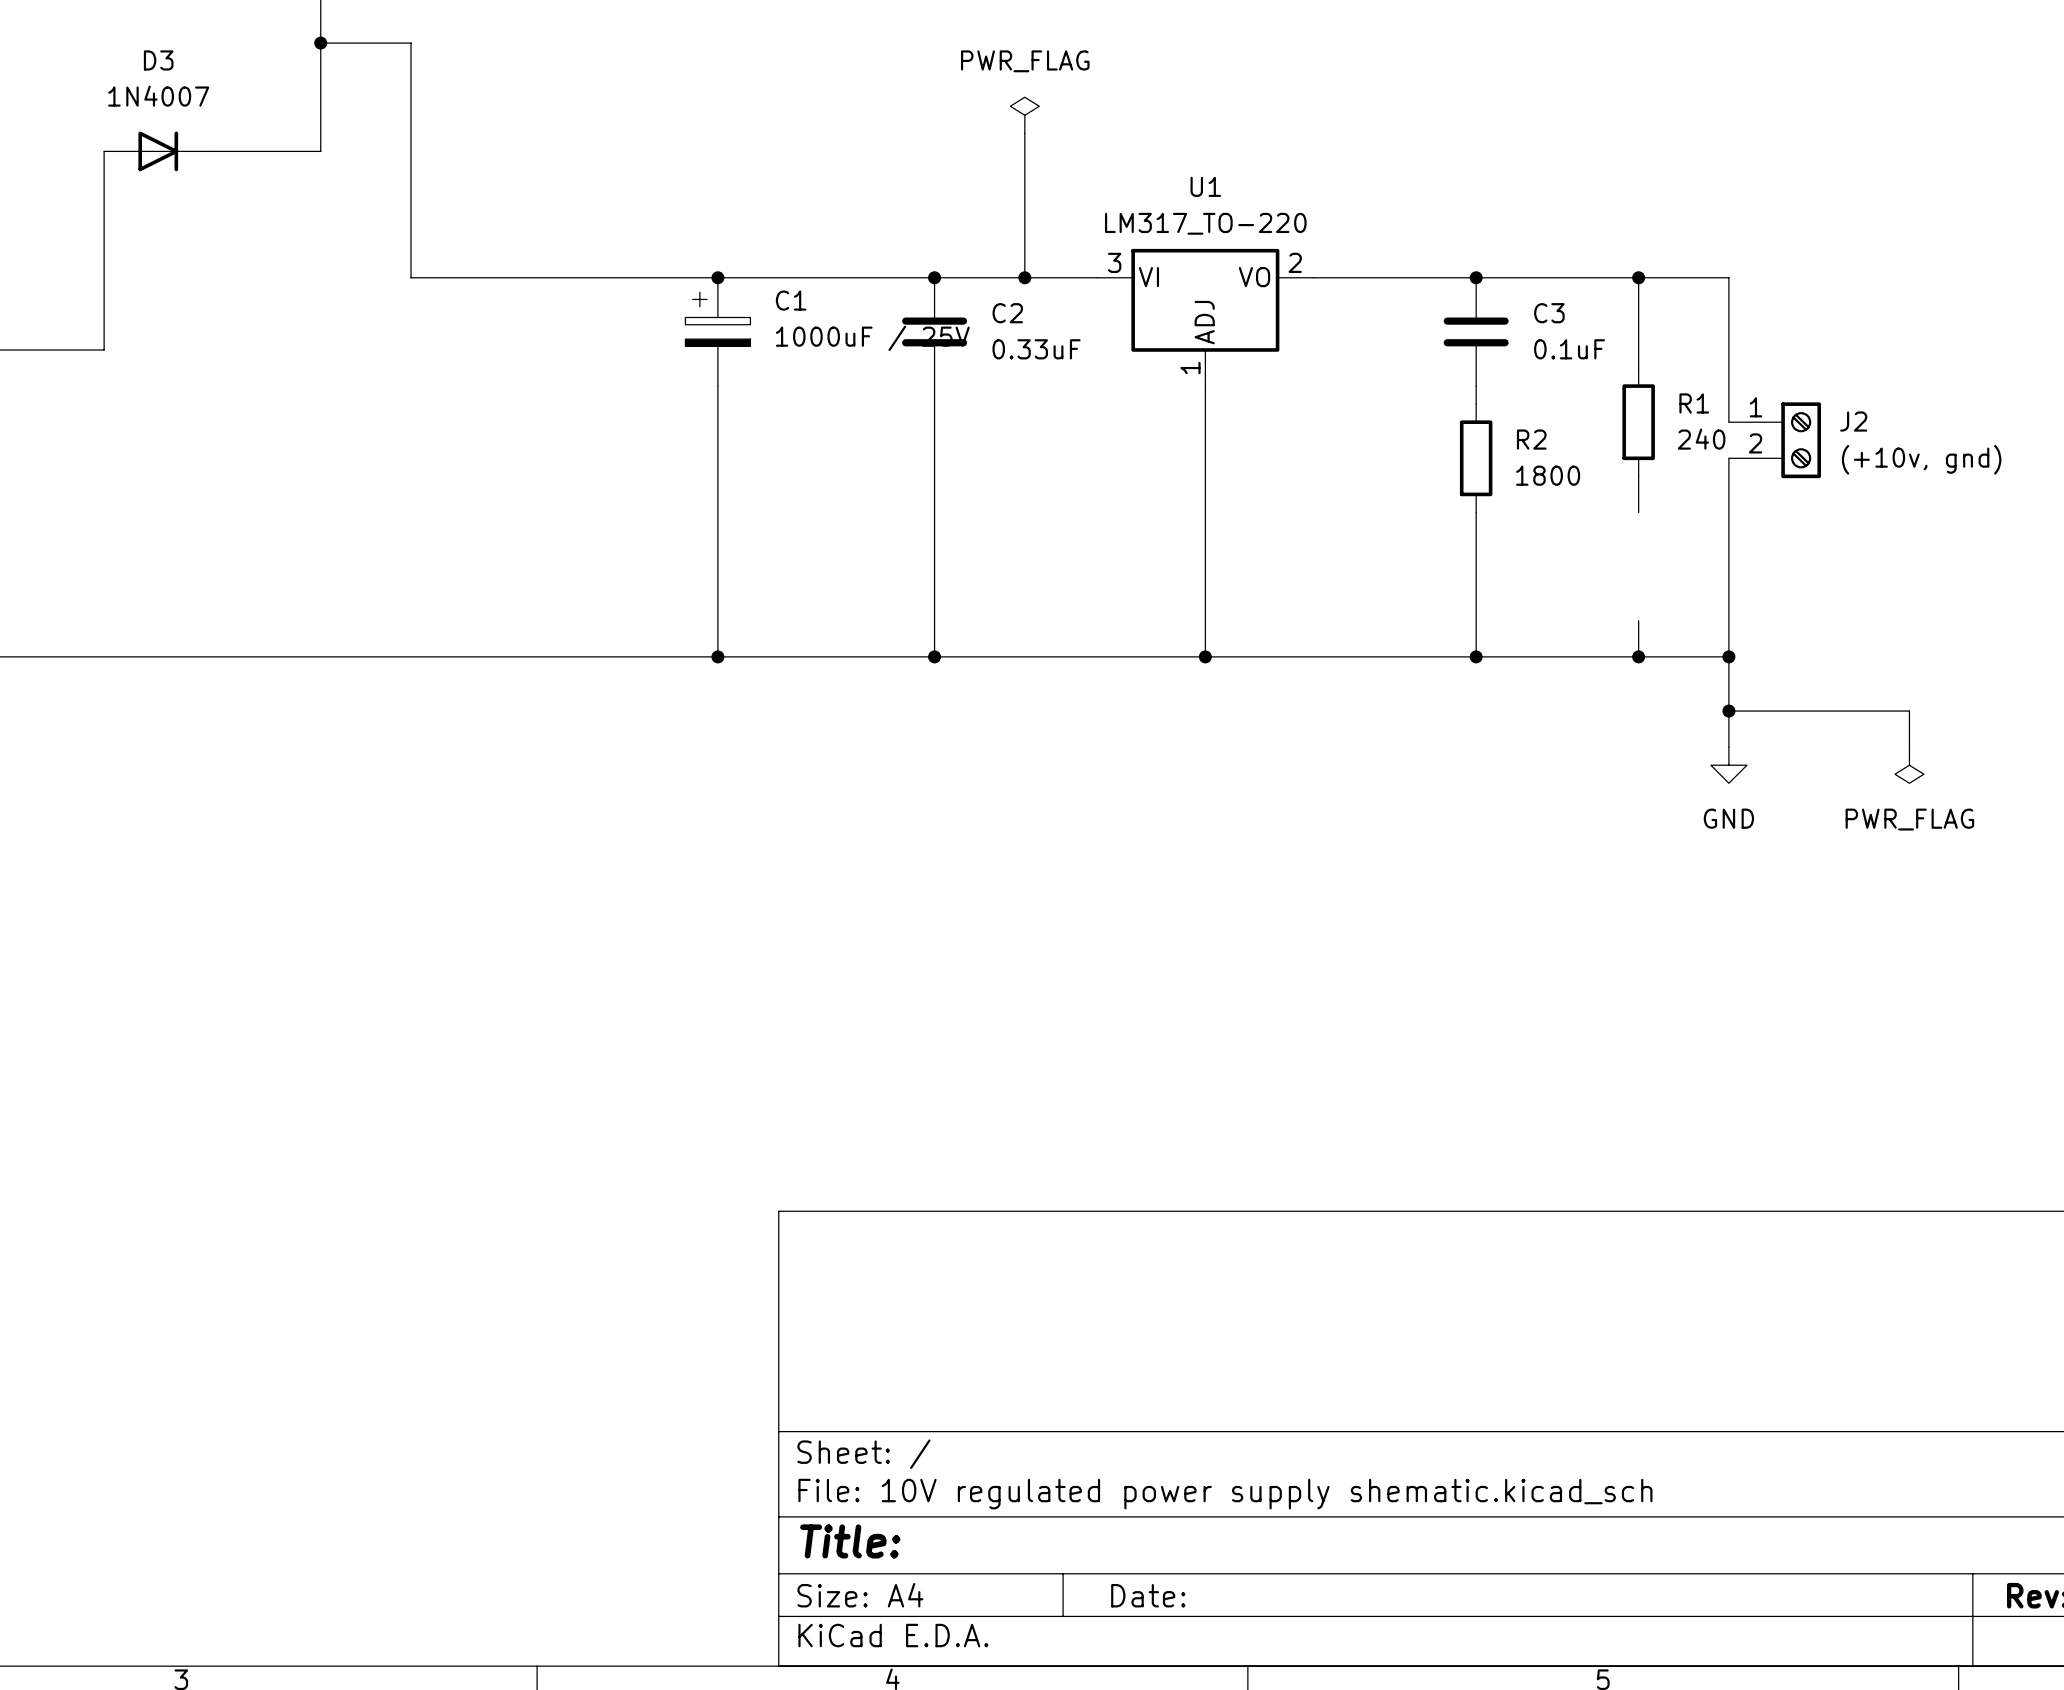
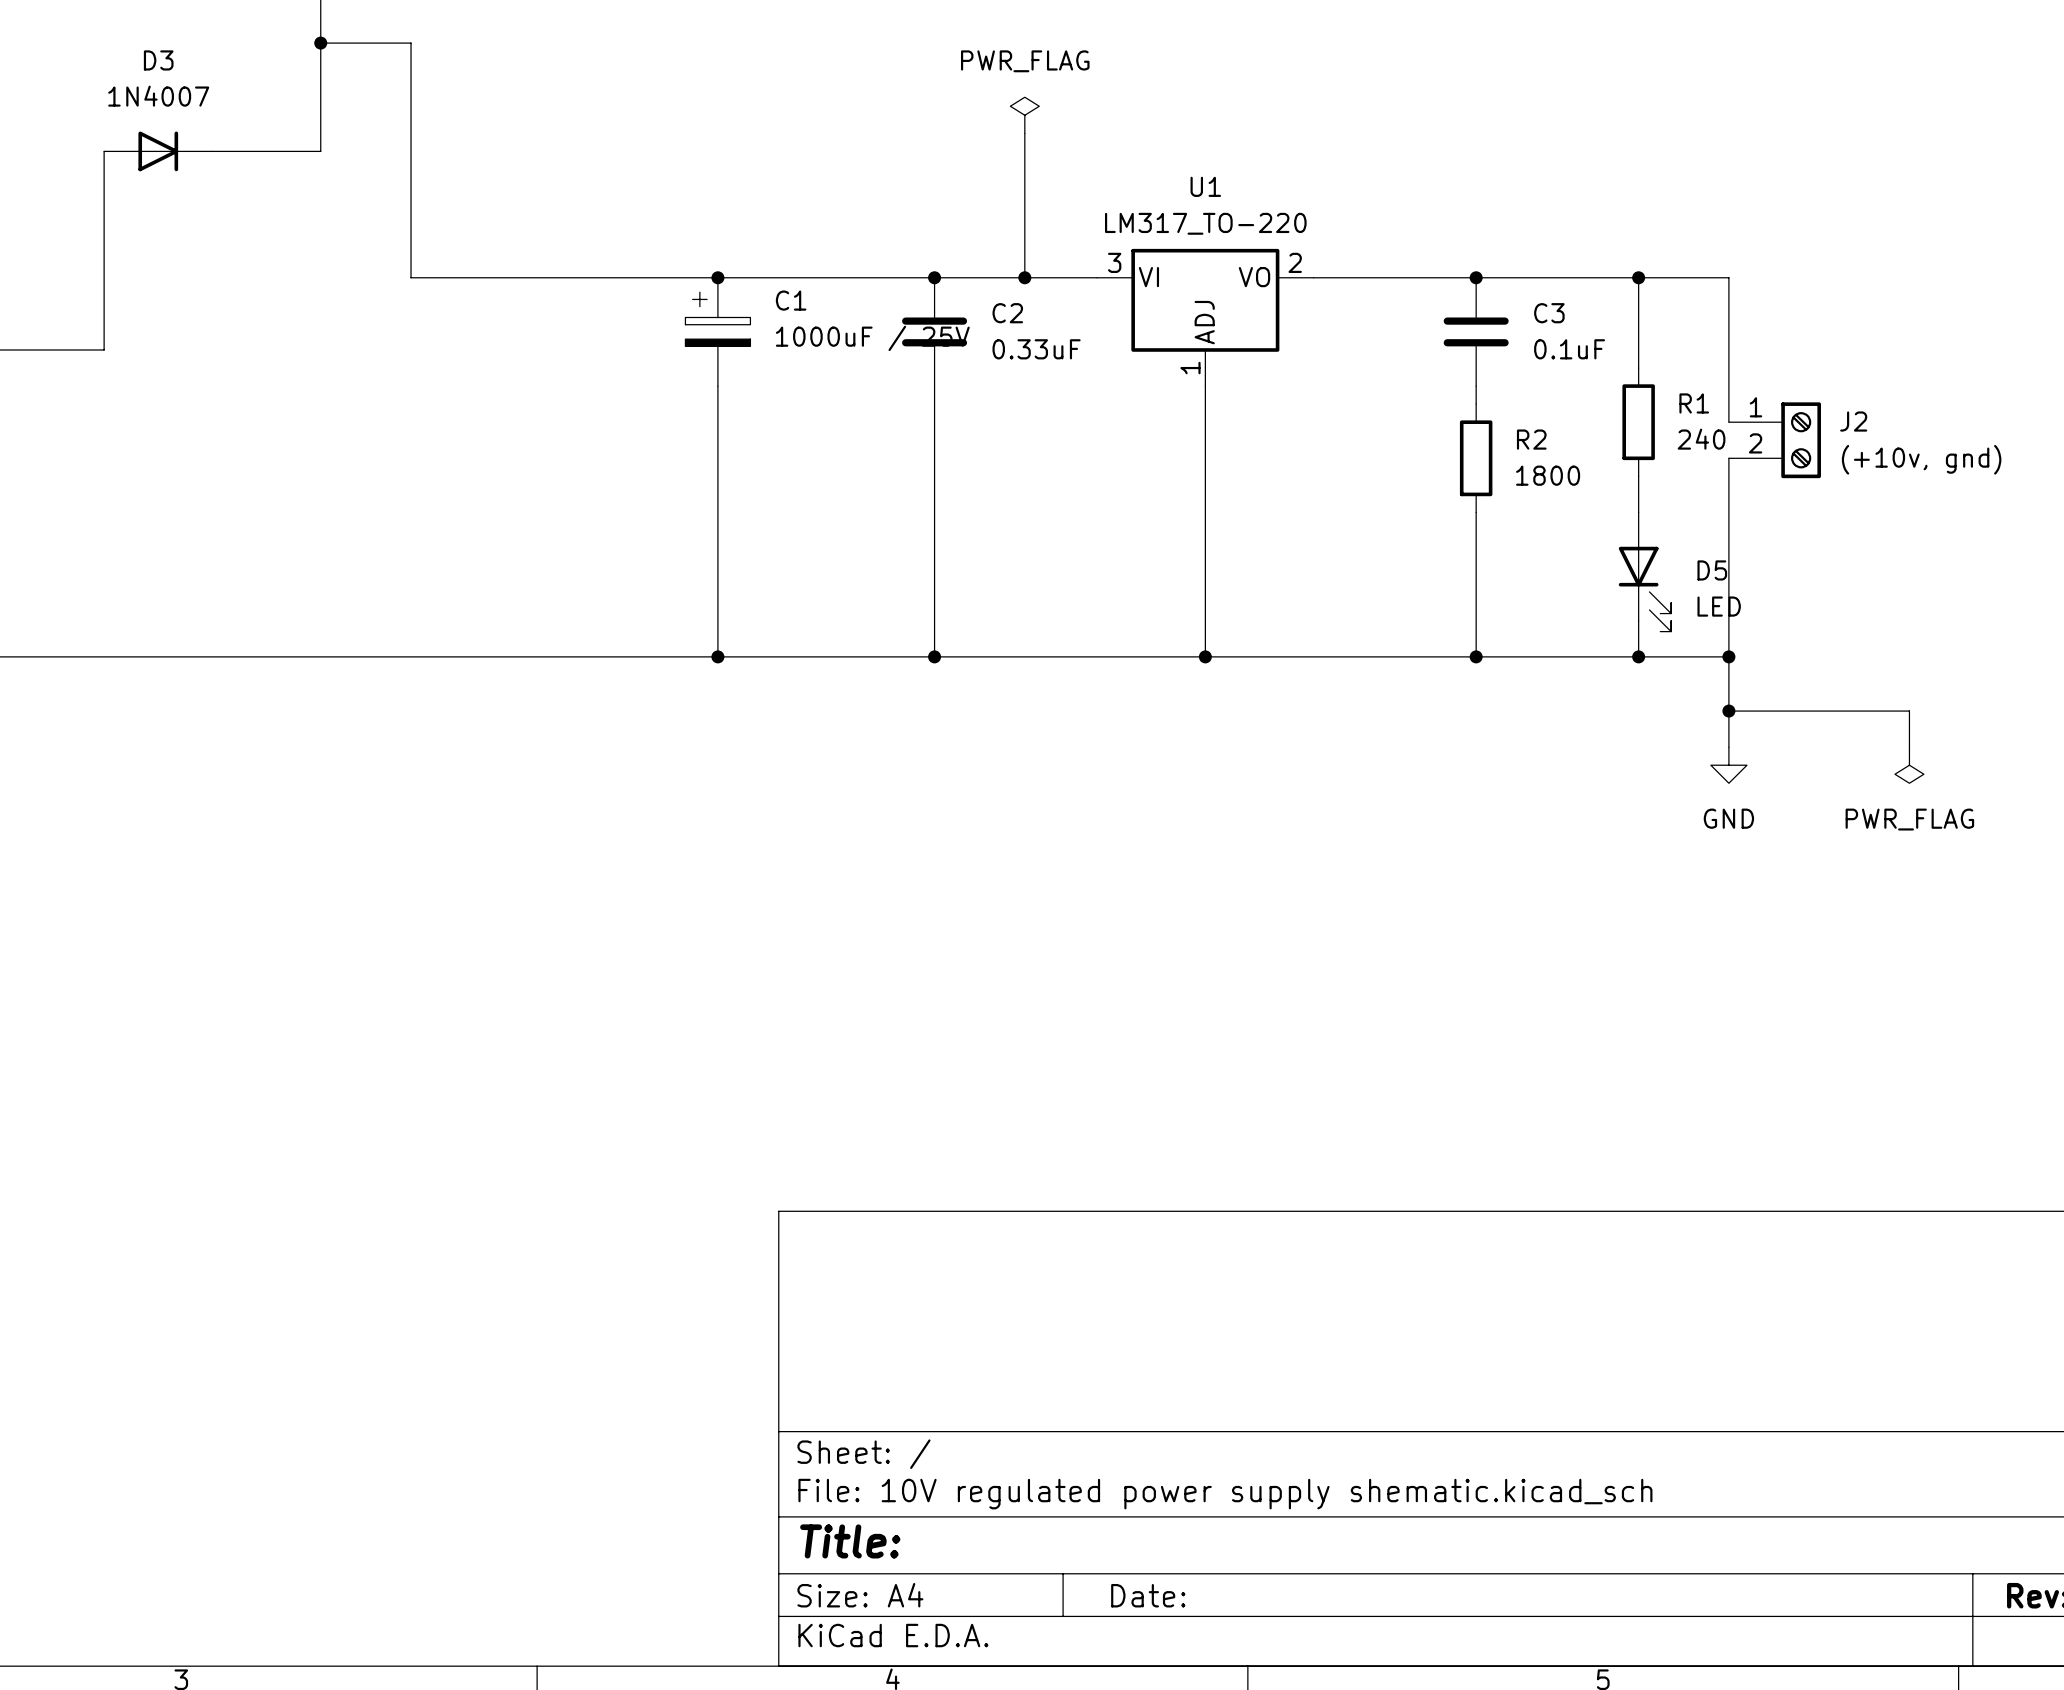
D5: none -> LED (1644, 572)

